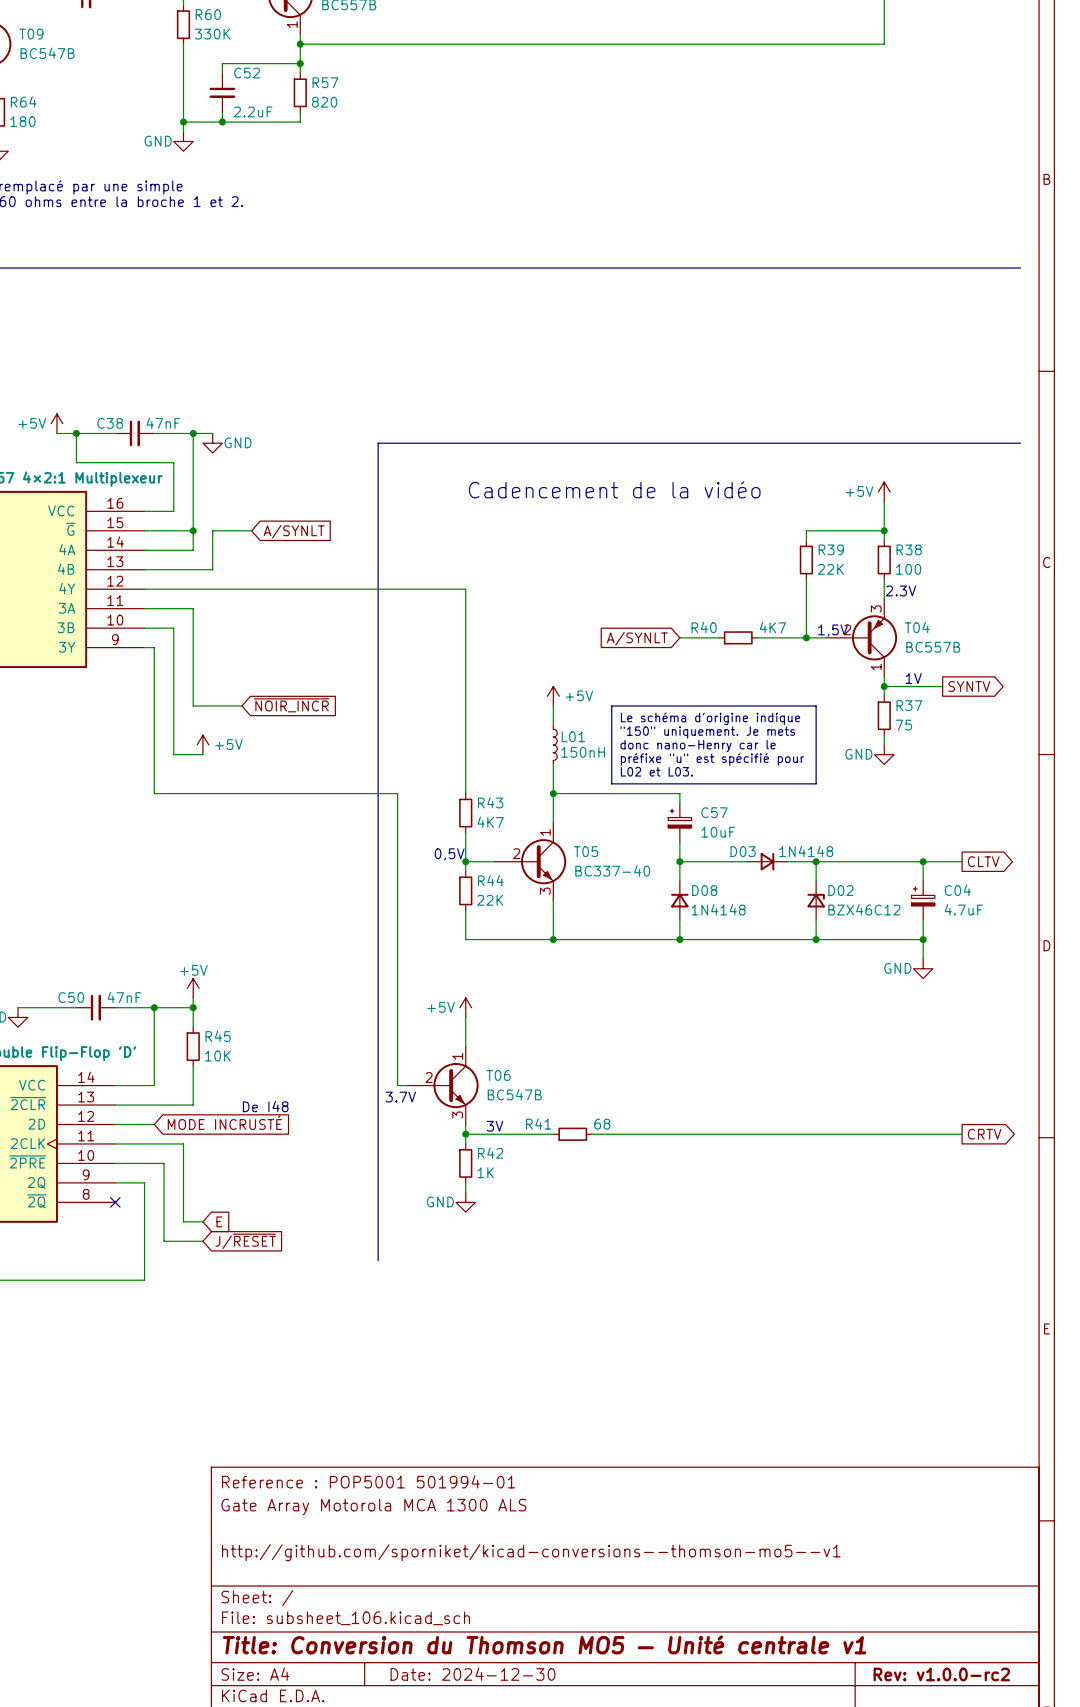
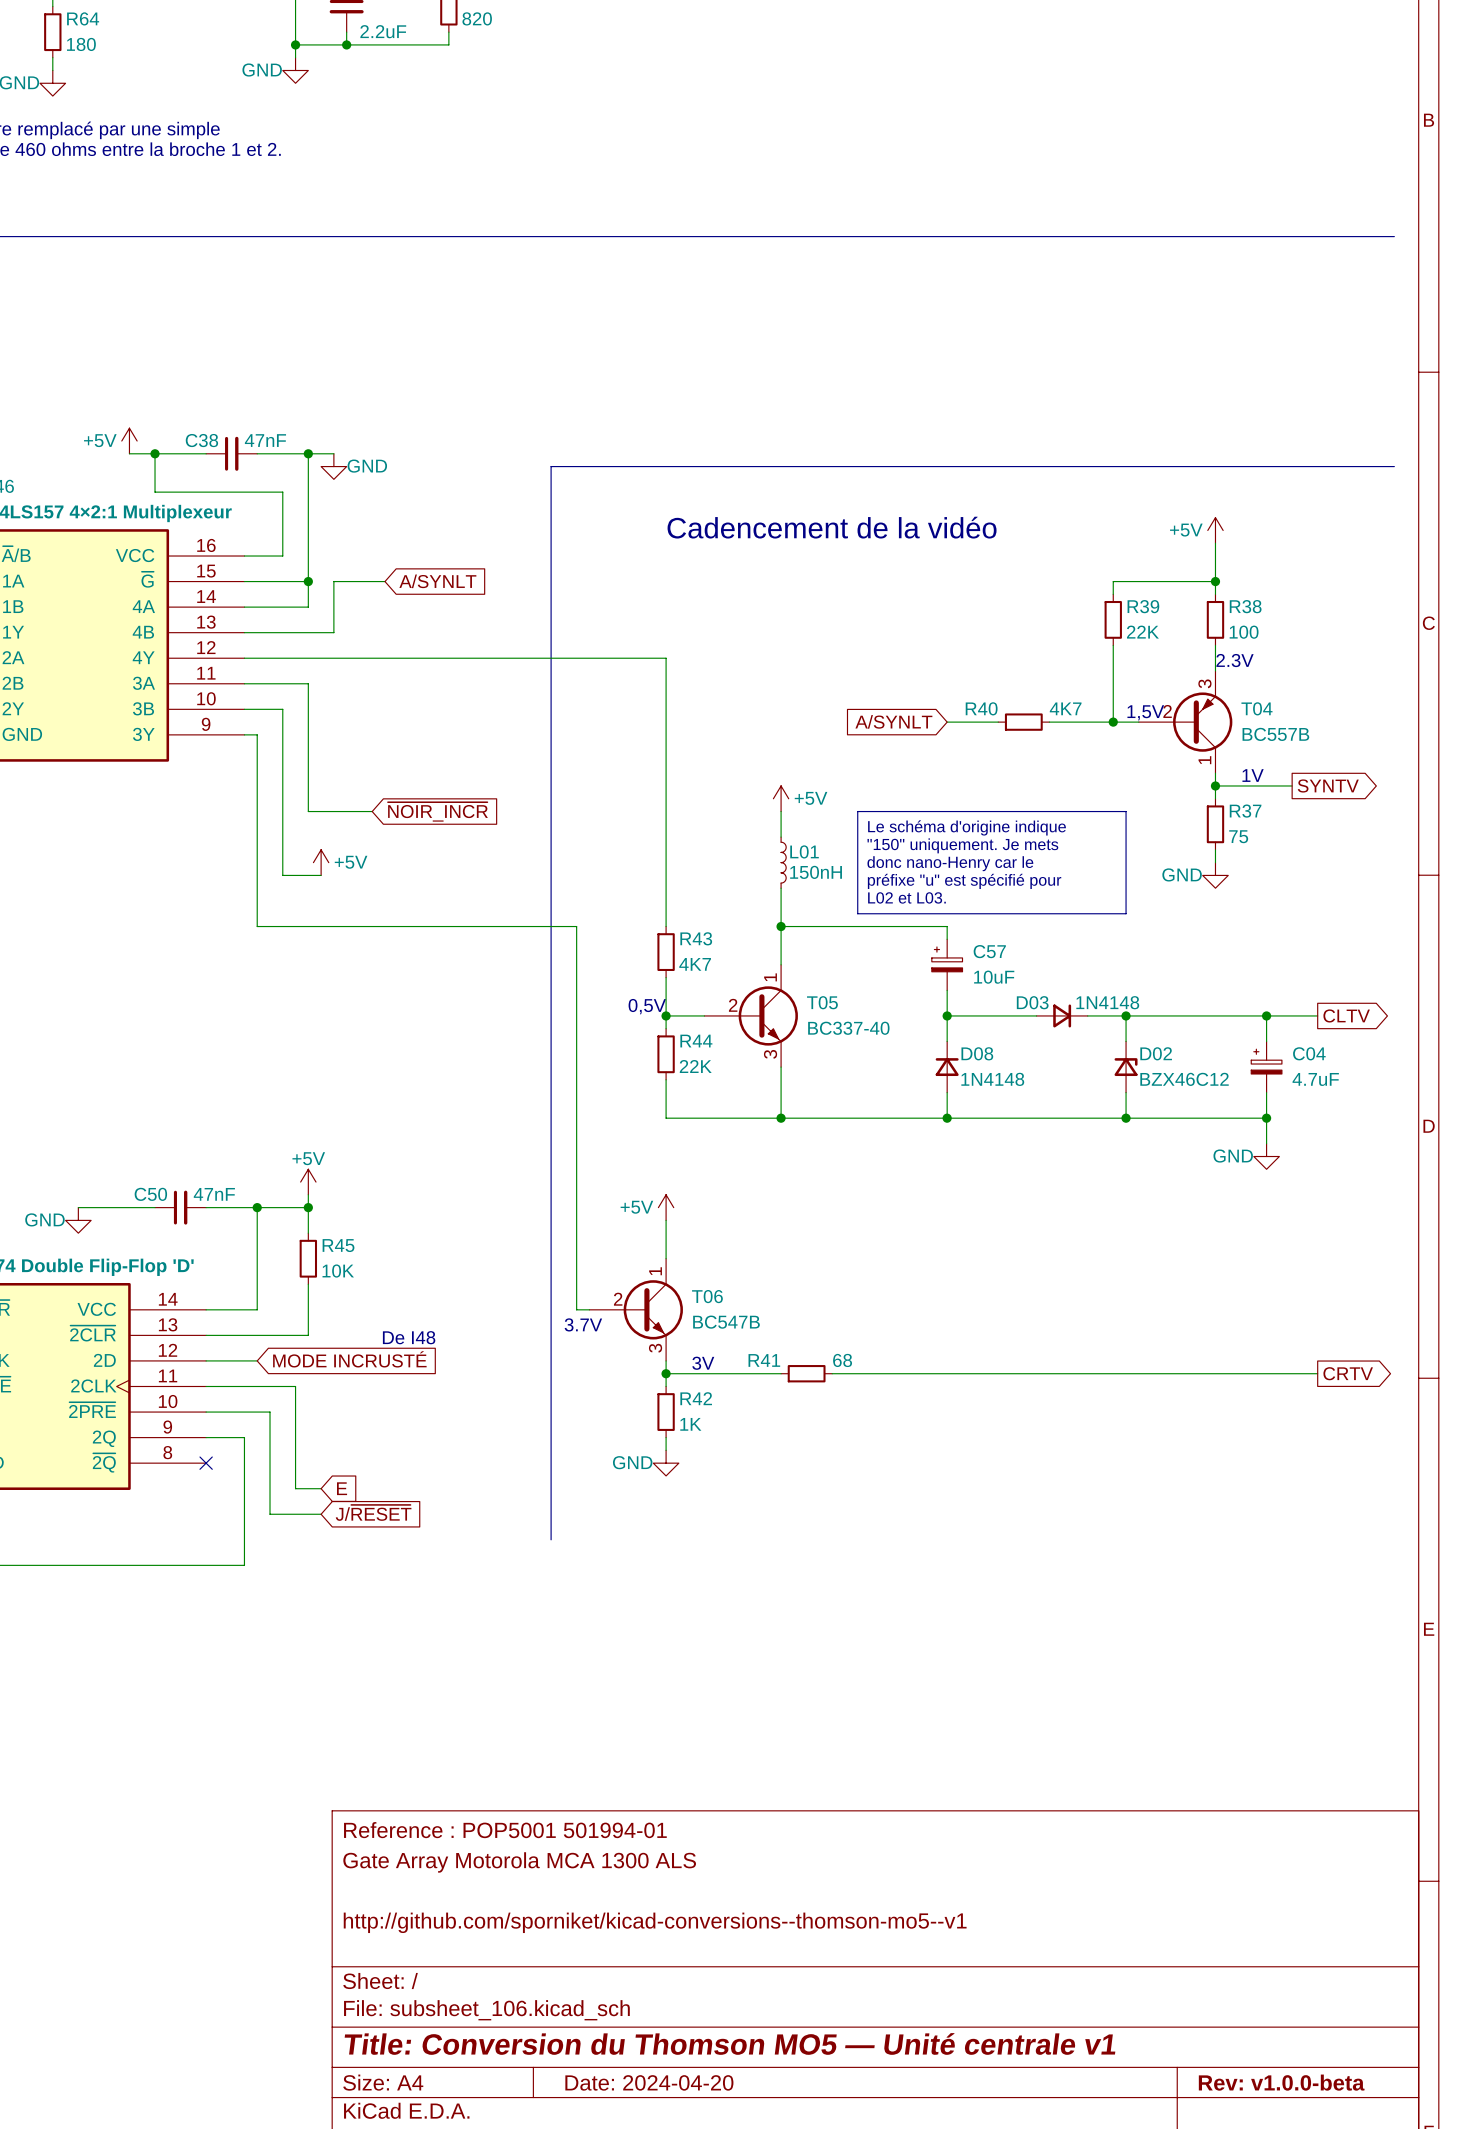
title block: Date: 2024-12-30 (472, 1674) -> Date: 2024-04-20 (649, 2082)
title block: Rev: v1.0.0-rc2 (941, 1674) -> Rev: v1.0.0-beta (1281, 2082)

